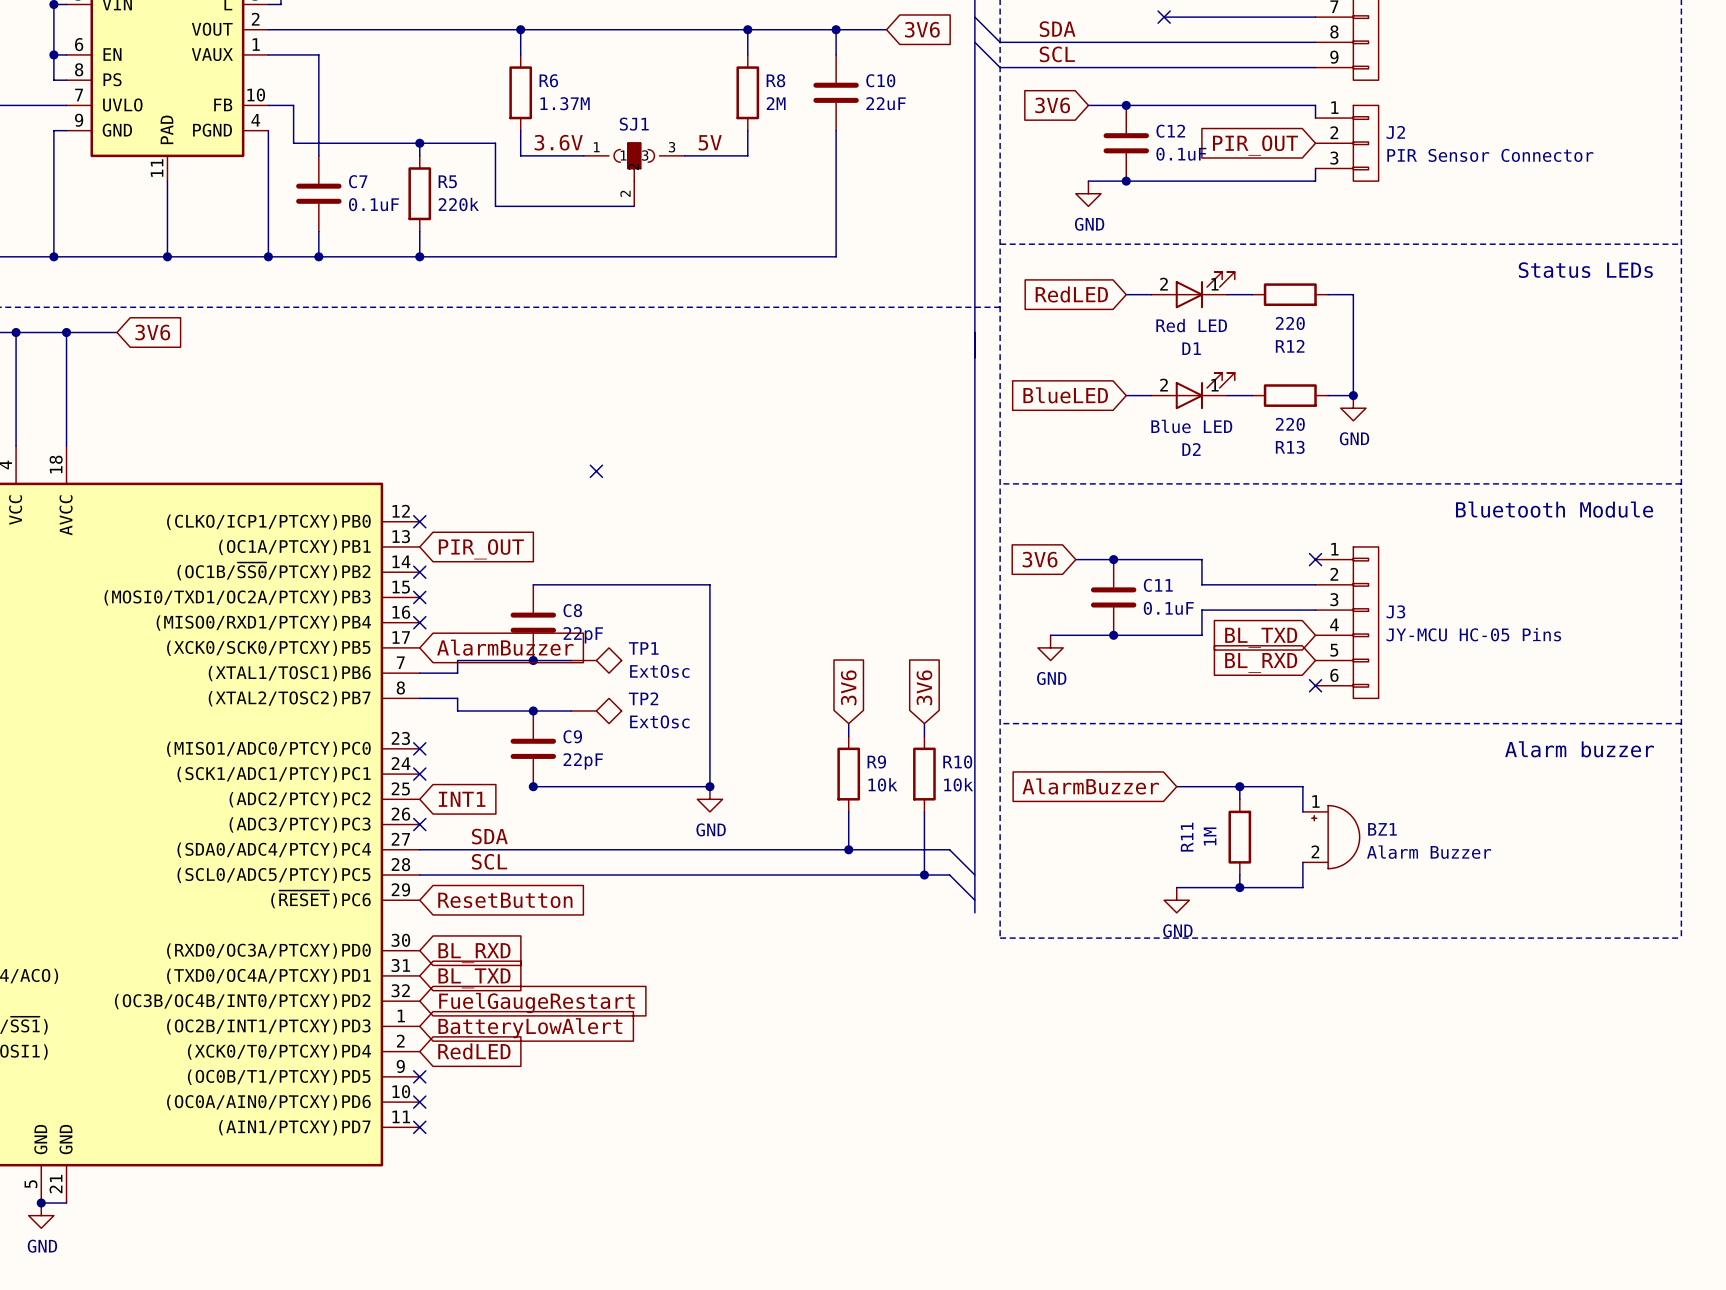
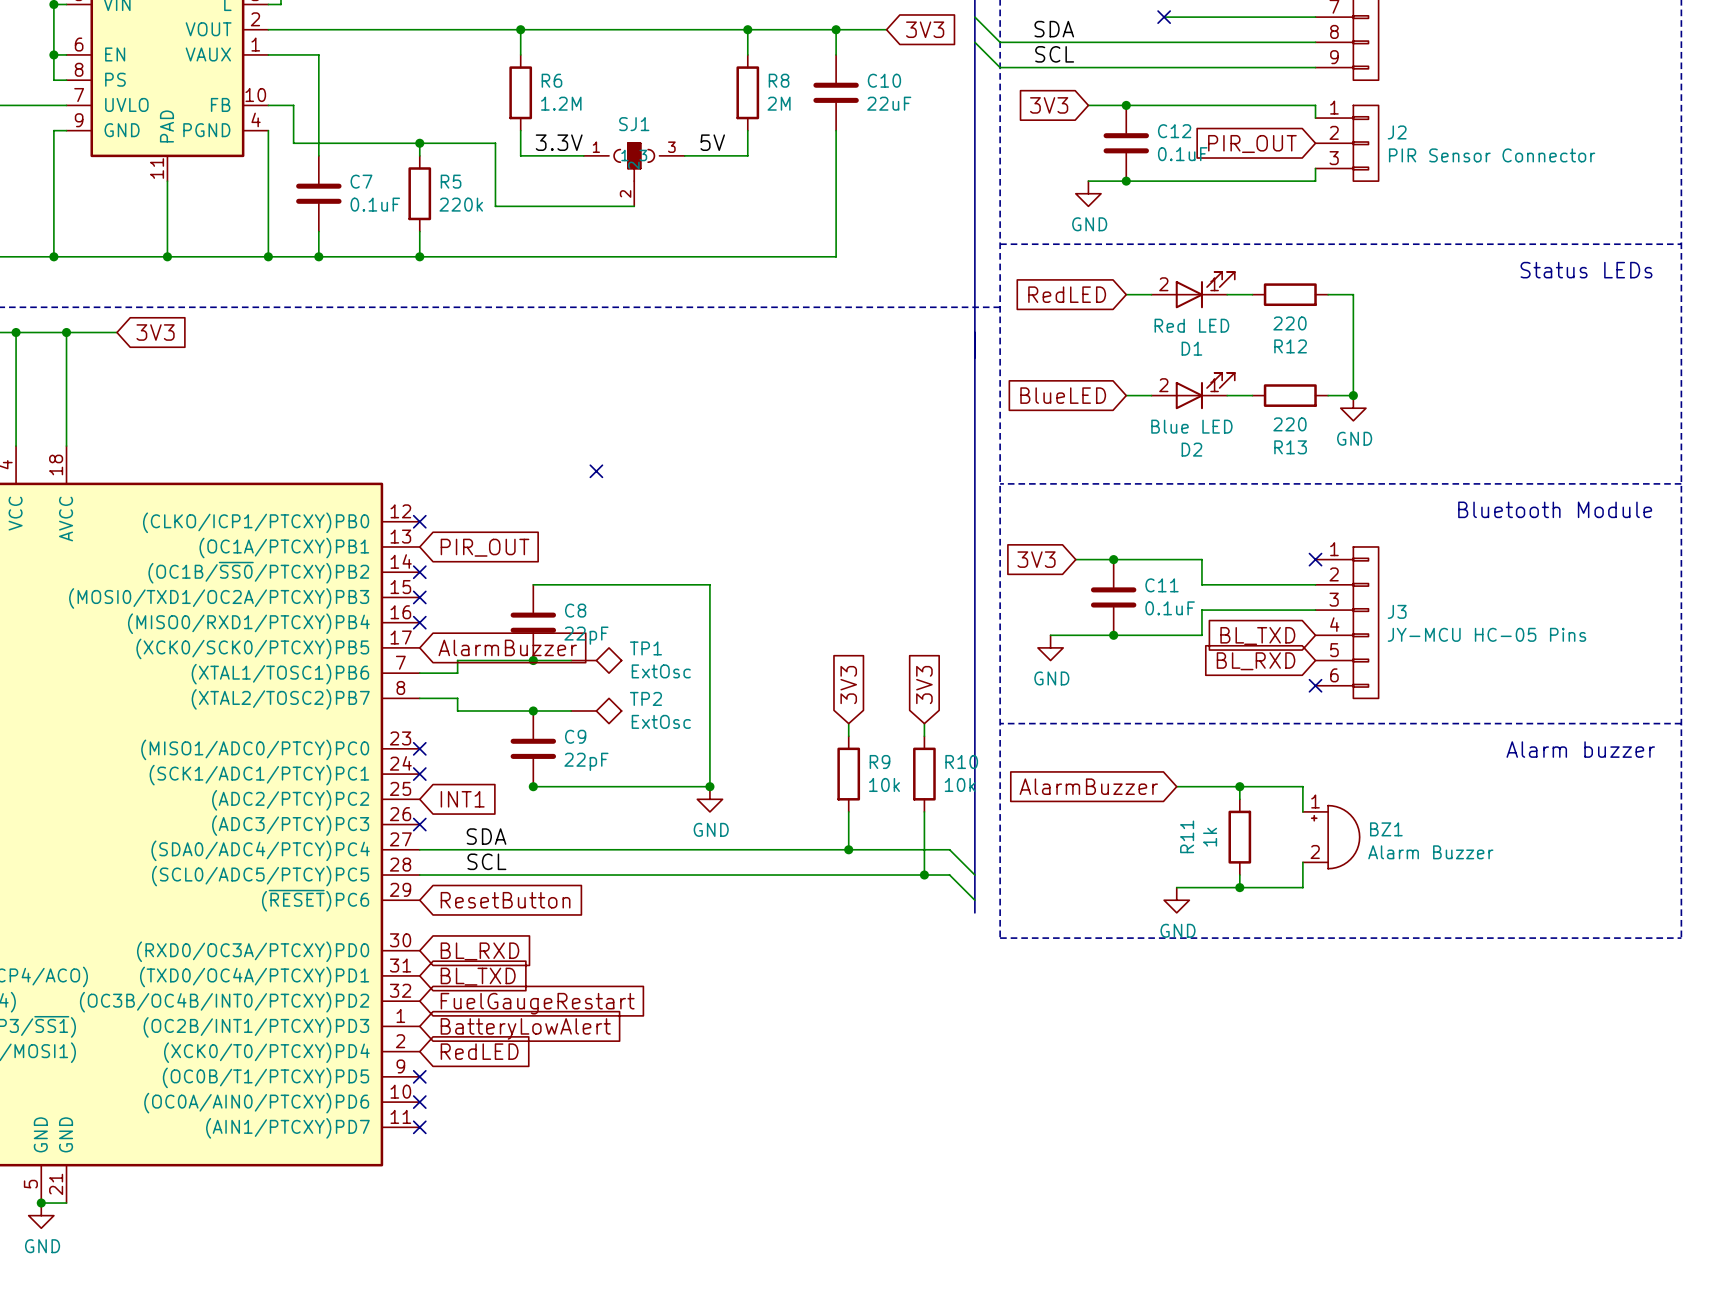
global label: 3V6 (922, 29) -> 3V3 (925, 29)
R6 value: 1.37M (565, 103) -> 1.2M (561, 103)
global label: 3V6 (1052, 105) -> 3V3 (1049, 105)
label: 3.6V (558, 142) -> 3.3V (559, 142)
global label: 3V6 (152, 332) -> 3V3 (155, 332)
global label: 3V6 (1040, 559) -> 3V3 (1036, 559)
global label: 3V6 (848, 687) -> 3V3 (848, 685)
global label: 3V6 (924, 687) -> 3V3 (924, 685)
R11 value: 1M (1210, 836) -> 1k (1210, 837)

